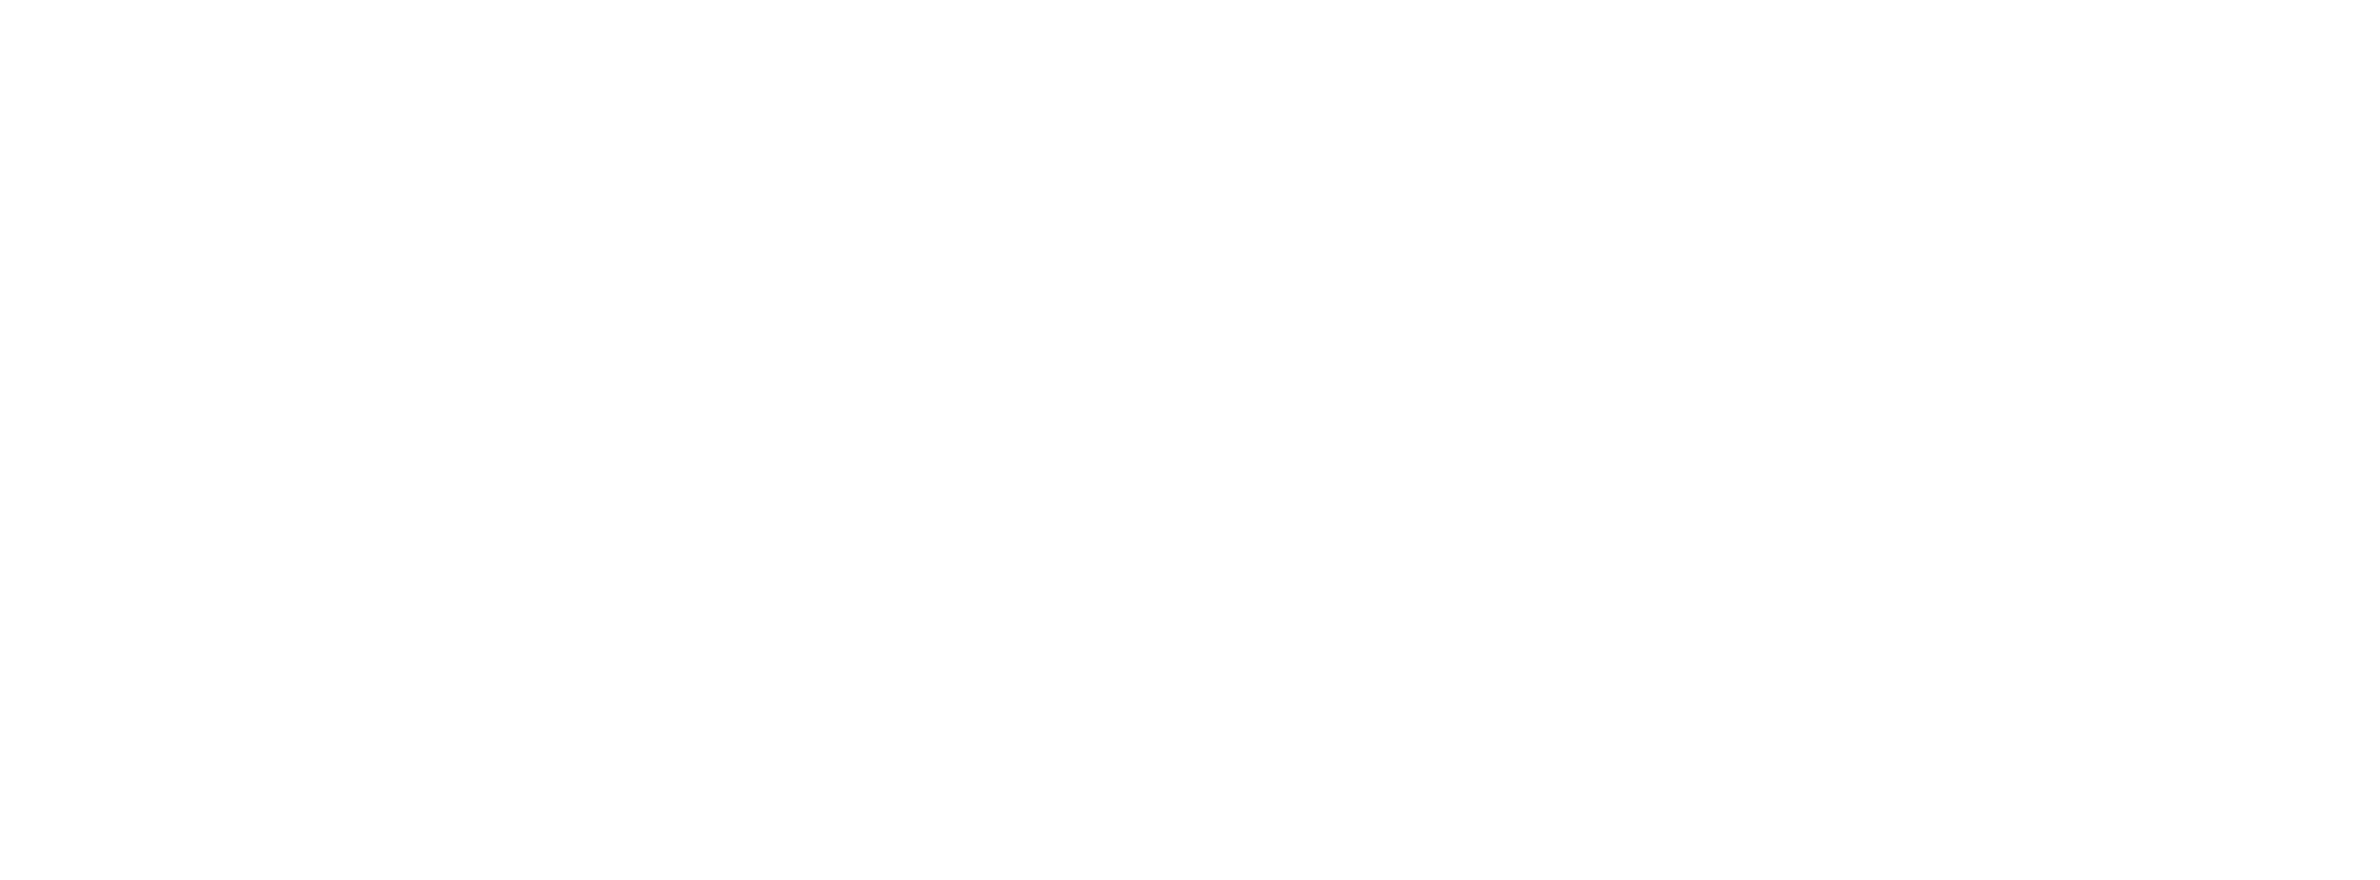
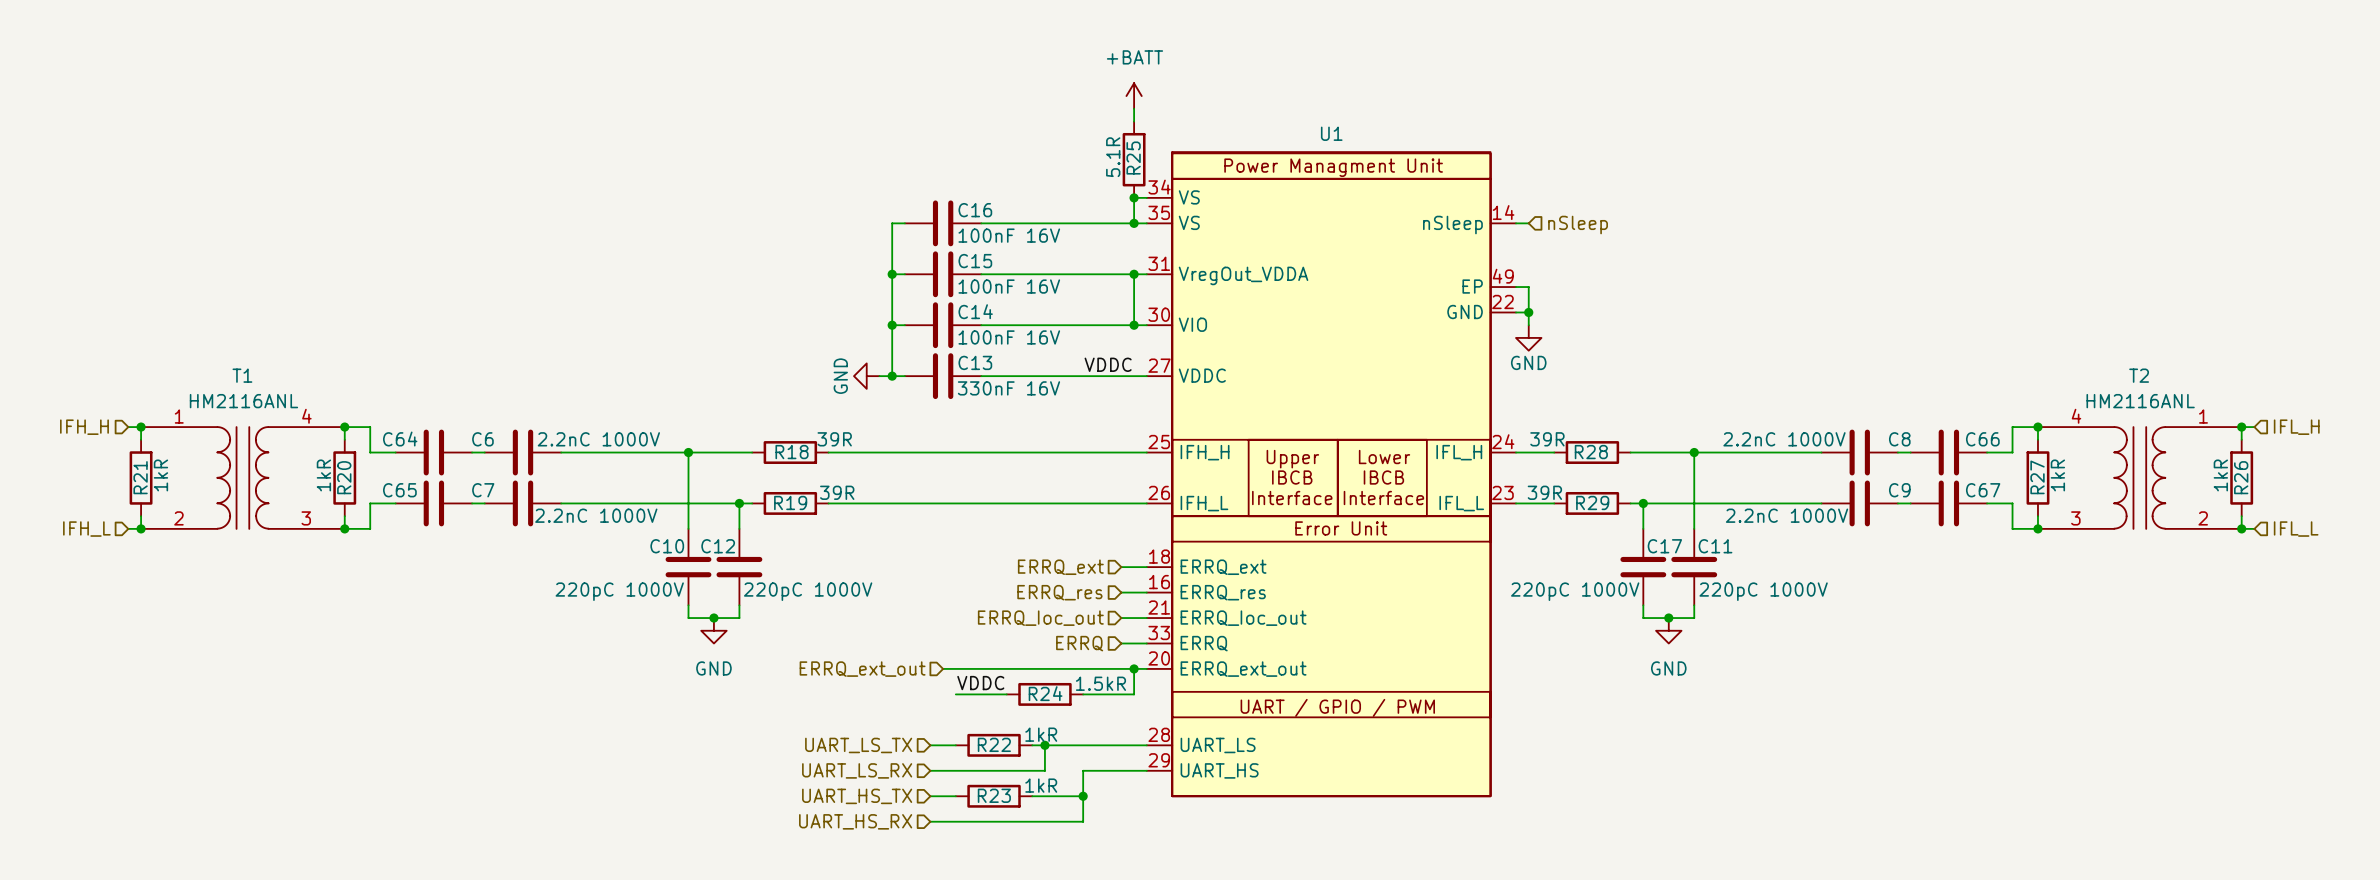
power symbol: none -> +BATT (1134, 96)
wire: none -> (1134, 108) (1134, 121)
R25: none -> 5.1R (1134, 159)
junction: none -> (1134, 197)
wire: none -> (1146, 197) (1134, 197) (1134, 223)
wire: none -> (904, 223) (892, 223) (892, 376)
C16: none -> 100nF 16V (943, 223)
wire: none -> (981, 223) (1146, 223)
junction: none -> (1134, 223)
wire: none -> (1516, 223) (1528, 223)
hierarchical label: none -> nSleep (1578, 225)
wire: none -> (892, 274) (904, 274)
junction: none -> (892, 274)
C15: none -> 100nF 16V (943, 274)
wire: none -> (981, 274) (1146, 274)
wire: none -> (1134, 274) (1134, 325)
junction: none -> (1134, 274)
wire: none -> (1516, 287) (1528, 287) (1528, 325)
wire: none -> (1516, 312) (1528, 312)
junction: none -> (1528, 312)
wire: none -> (892, 325) (904, 325)
junction: none -> (892, 325)
C14: none -> 100nF 16V (943, 325)
wire: none -> (981, 325) (1146, 325)
junction: none -> (1134, 325)
power symbol: none -> GND (1528, 337)
label: none -> VDDC (1108, 364)
power symbol: none -> GND (866, 376)
wire: none -> (879, 376) (904, 376)
junction: none -> (892, 376)
C13: none -> 330nF 16V (943, 376)
wire: none -> (981, 376) (1146, 376)
wire: none -> (128, 427) (141, 427) (141, 439)
junction: none -> (141, 427)
junction: none -> (344, 427)
junction: none -> (2037, 427)
junction: none -> (2241, 427)
wire: none -> (2254, 427) (2241, 427) (2241, 439)
hierarchical label: none -> IFH_H (84, 427)
hierarchical label: none -> IFL_H (2296, 427)
wire: none -> (344, 439) (344, 427) (370, 427) (370, 452) (395, 452)
wire: none -> (2037, 439) (2037, 427) (2012, 427) (2012, 452) (1987, 452)
C64: none -> (433, 452)
wire: none -> (472, 452) (484, 452)
C6: none -> 2.2nC 1000V (522, 452)
wire: none -> (561, 452) (752, 452)
wire: none -> (688, 452) (688, 528)
junction: none -> (688, 452)
R18: none -> 39R (790, 452)
wire: none -> (828, 452) (1146, 452)
wire: none -> (1516, 452) (1554, 452)
R28: none -> 39R (1592, 452)
wire: none -> (1630, 452) (1821, 452)
wire: none -> (1694, 452) (1694, 528)
junction: none -> (1694, 452)
C8: none -> 2.2nC 1000V (1859, 452)
wire: none -> (1897, 452) (1910, 452)
C66: none -> (1948, 452)
U1: none -> (1331, 474)
R21: none -> 1kR (141, 477)
T1: none -> HM2116ANL (242, 477)
R20: none -> 1kR (344, 477)
R27: none -> 1kR (2037, 477)
T2: none -> HM2116ANL (2139, 477)
R26: none -> 1kR (2241, 477)
wire: none -> (395, 503) (370, 503) (370, 528) (344, 528) (344, 516)
C65: none -> (433, 503)
wire: none -> (472, 503) (484, 503)
C7: none -> 2.2nC 1000V (522, 503)
wire: none -> (561, 503) (752, 503)
wire: none -> (739, 503) (739, 528)
junction: none -> (739, 503)
R19: none -> 39R (790, 503)
wire: none -> (828, 503) (1146, 503)
wire: none -> (1516, 503) (1554, 503)
R29: none -> 39R (1592, 503)
wire: none -> (1630, 503) (1821, 503)
wire: none -> (1643, 503) (1643, 528)
junction: none -> (1643, 503)
C9: none -> 2.2nC 1000V (1859, 503)
wire: none -> (1897, 503) (1910, 503)
C67: none -> (1948, 503)
wire: none -> (1987, 503) (2012, 503) (2012, 528) (2037, 528) (2037, 516)
wire: none -> (141, 516) (141, 528) (128, 528)
wire: none -> (2241, 516) (2241, 528) (2254, 528)
junction: none -> (141, 528)
junction: none -> (344, 528)
junction: none -> (2037, 528)
junction: none -> (2241, 528)
hierarchical label: none -> IFH_L (86, 529)
hierarchical label: none -> IFL_L (2296, 529)
C10: none -> 220pC 1000V (688, 567)
C12: none -> 220pC 1000V (739, 567)
wire: none -> (1121, 567) (1146, 567)
C17: none -> 220pC 1000V (1643, 567)
C11: none -> 220pC 1000V (1694, 567)
hierarchical label: none -> ERRQ_ext (1060, 567)
wire: none -> (1121, 592) (1146, 592)
hierarchical label: none -> ERRQ_res (1059, 592)
wire: none -> (688, 605) (688, 618) (739, 618) (739, 605)
wire: none -> (1643, 605) (1643, 618) (1694, 618) (1694, 605)
junction: none -> (713, 618)
hierarchical label: none -> ERRQ_Ioc_out (1040, 618)
wire: none -> (1121, 618) (1146, 618)
junction: none -> (1668, 618)
power symbol: none -> GND (713, 630)
power symbol: none -> GND (1668, 630)
wire: none -> (1121, 643) (1146, 643)
hierarchical label: none -> ERRQ (1079, 643)
wire: none -> (943, 668) (1146, 668)
wire: none -> (1134, 668) (1134, 694) (1083, 694)
junction: none -> (1134, 668)
hierarchical label: none -> ERRQ_ext_out (862, 669)
label: none -> VDDC (980, 683)
wire: none -> (955, 694) (1006, 694)
R24: none -> 1.5kR (1044, 694)
wire: none -> (930, 745) (955, 745)
R22: none -> 1kR (994, 745)
wire: none -> (1032, 745) (1146, 745)
wire: none -> (1044, 745) (1044, 770) (930, 770)
junction: none -> (1044, 745)
hierarchical label: none -> UART_LS_TX (858, 745)
wire: none -> (1146, 770) (1083, 770) (1083, 821) (930, 821)
hierarchical label: none -> UART_LS_RX (857, 770)
wire: none -> (930, 796) (955, 796)
R23: none -> 1kR (994, 796)
wire: none -> (1032, 796) (1083, 796)
junction: none -> (1083, 796)
hierarchical label: none -> UART_HS_TX (857, 796)
hierarchical label: none -> UART_HS_RX (855, 821)

